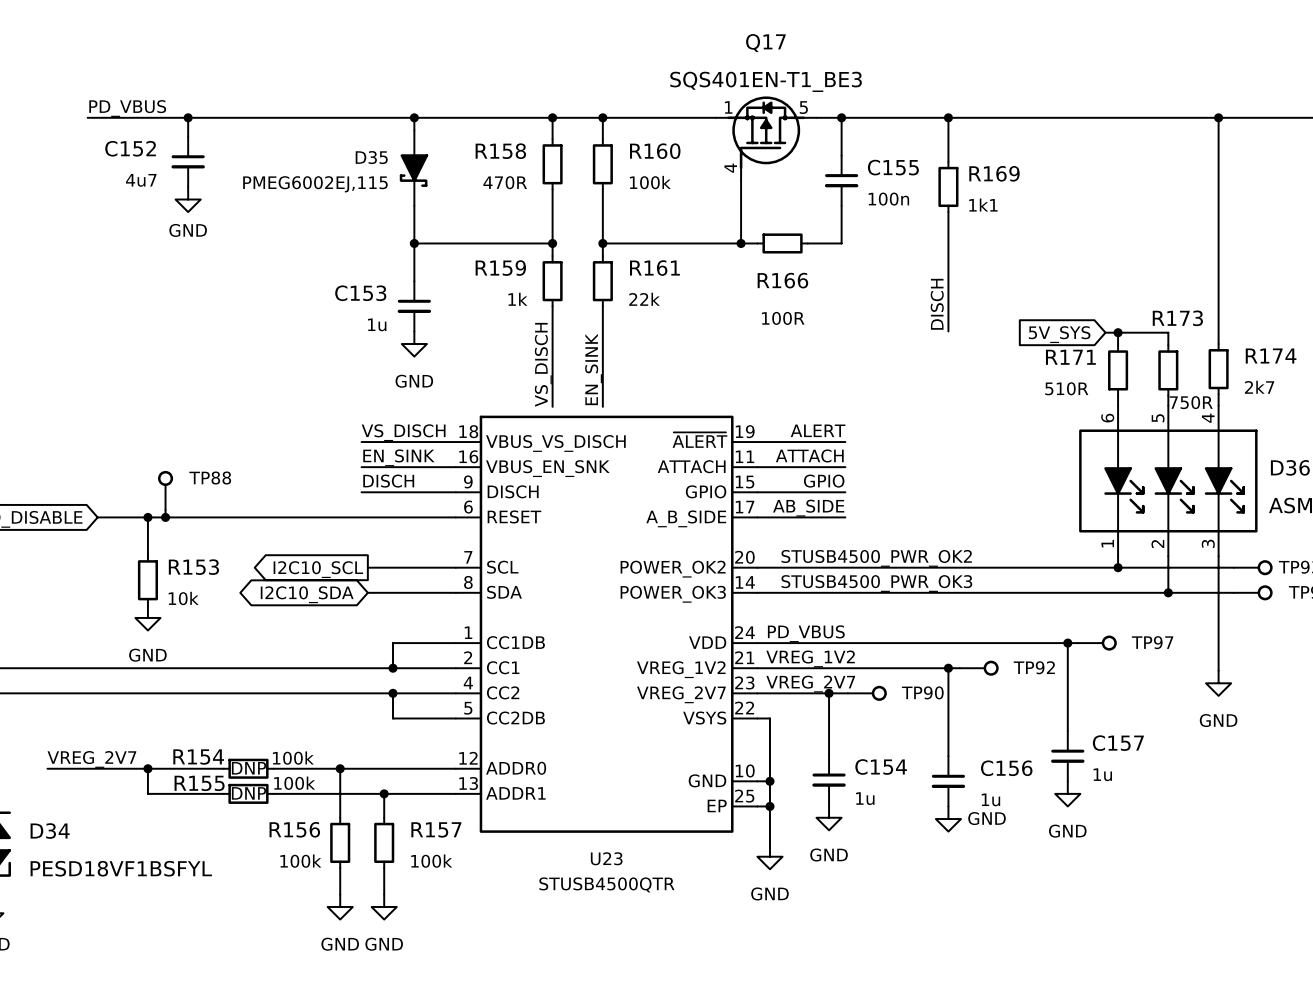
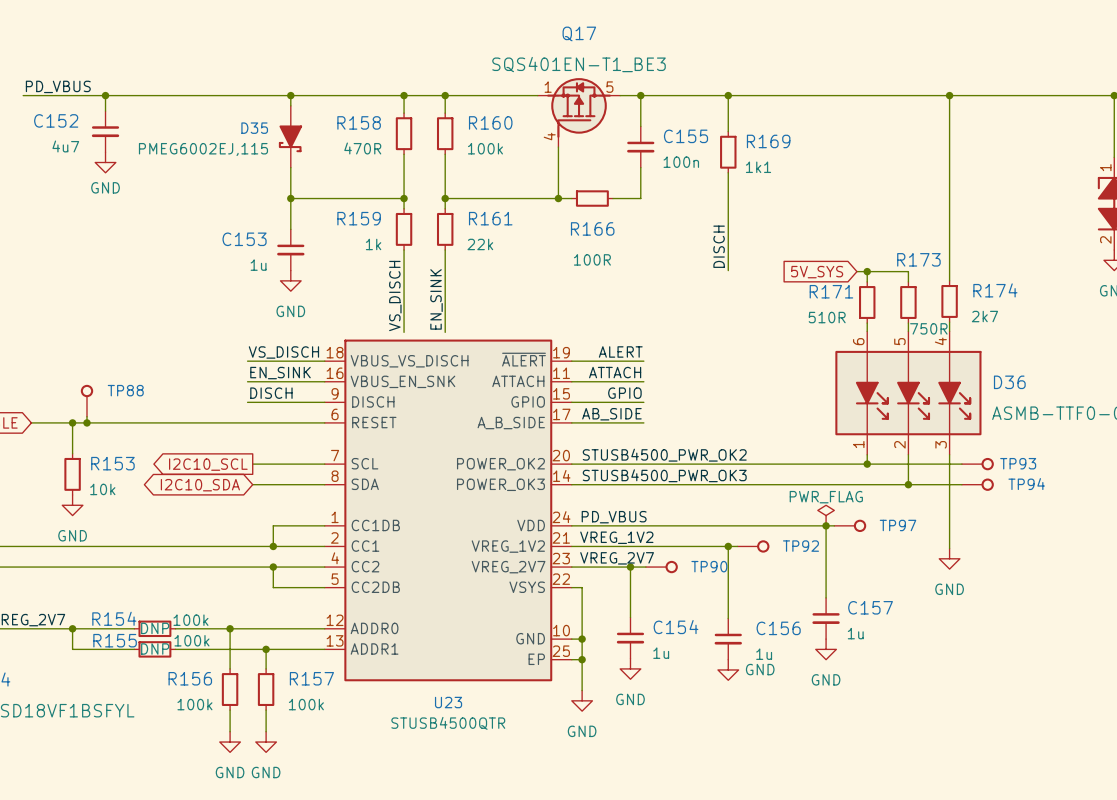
power symbol: none -> PWR_FLAG (826, 515)

